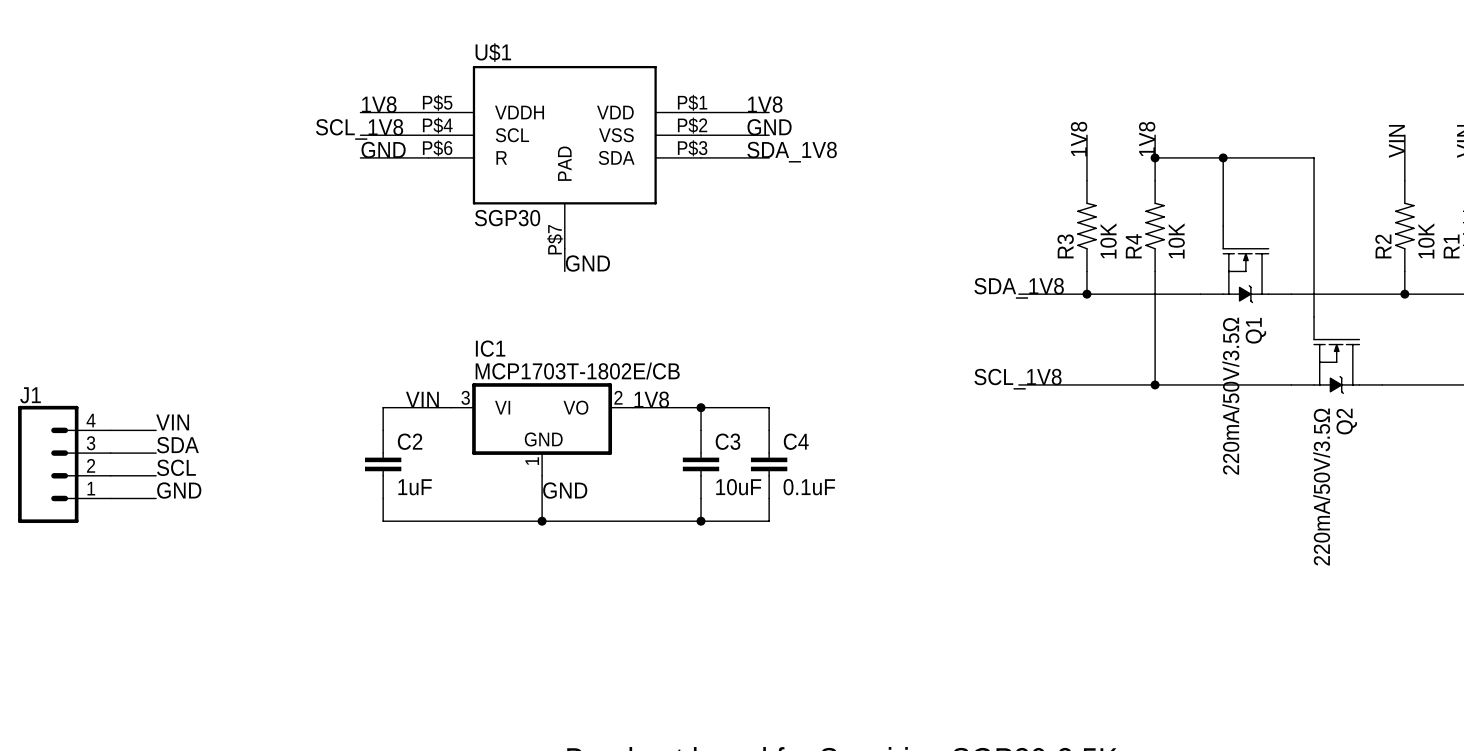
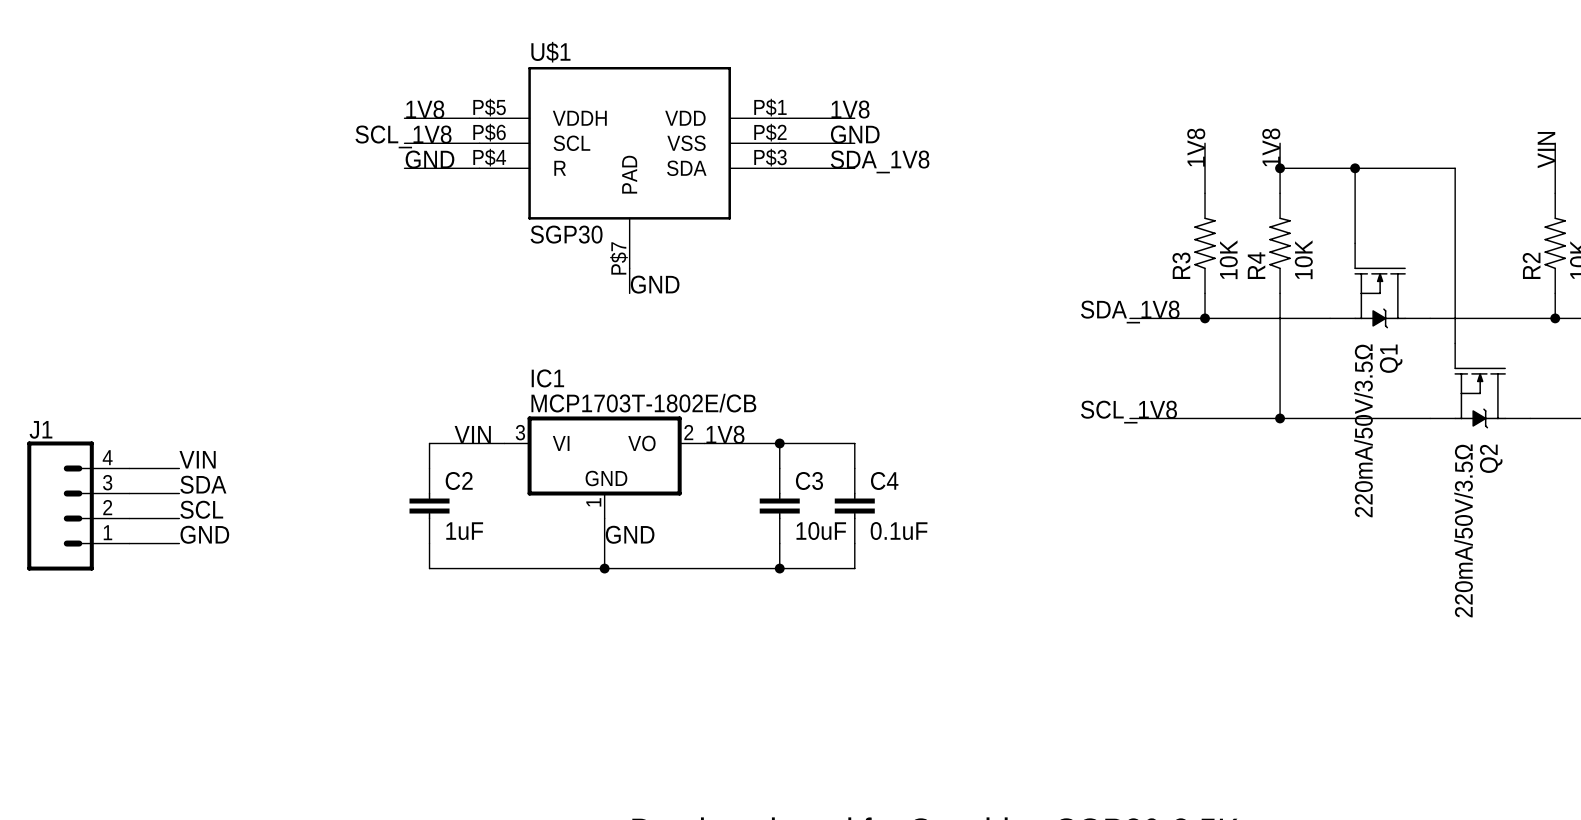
U$1 pin number: P$4 (437, 125) -> P$6 (489, 132)
U$1 pin number: P$6 (437, 148) -> P$4 (489, 157)

